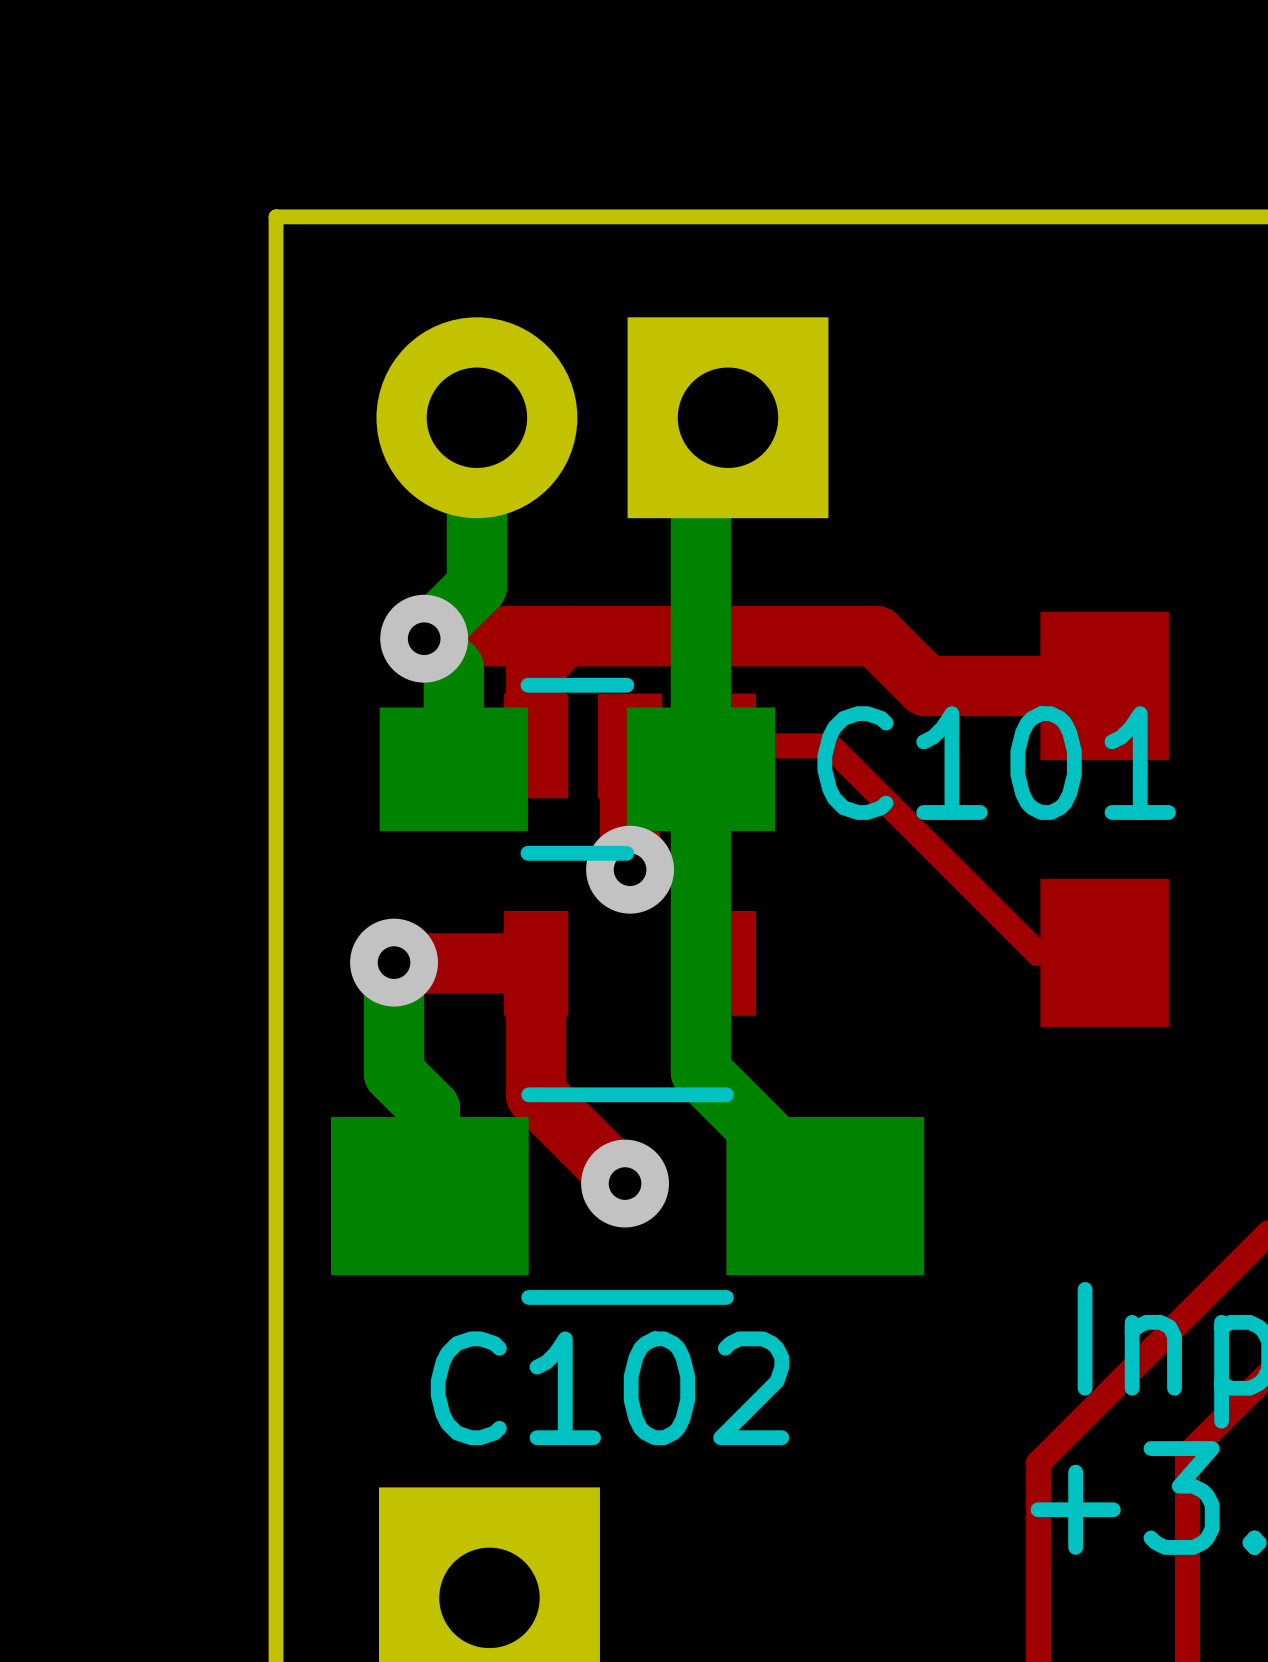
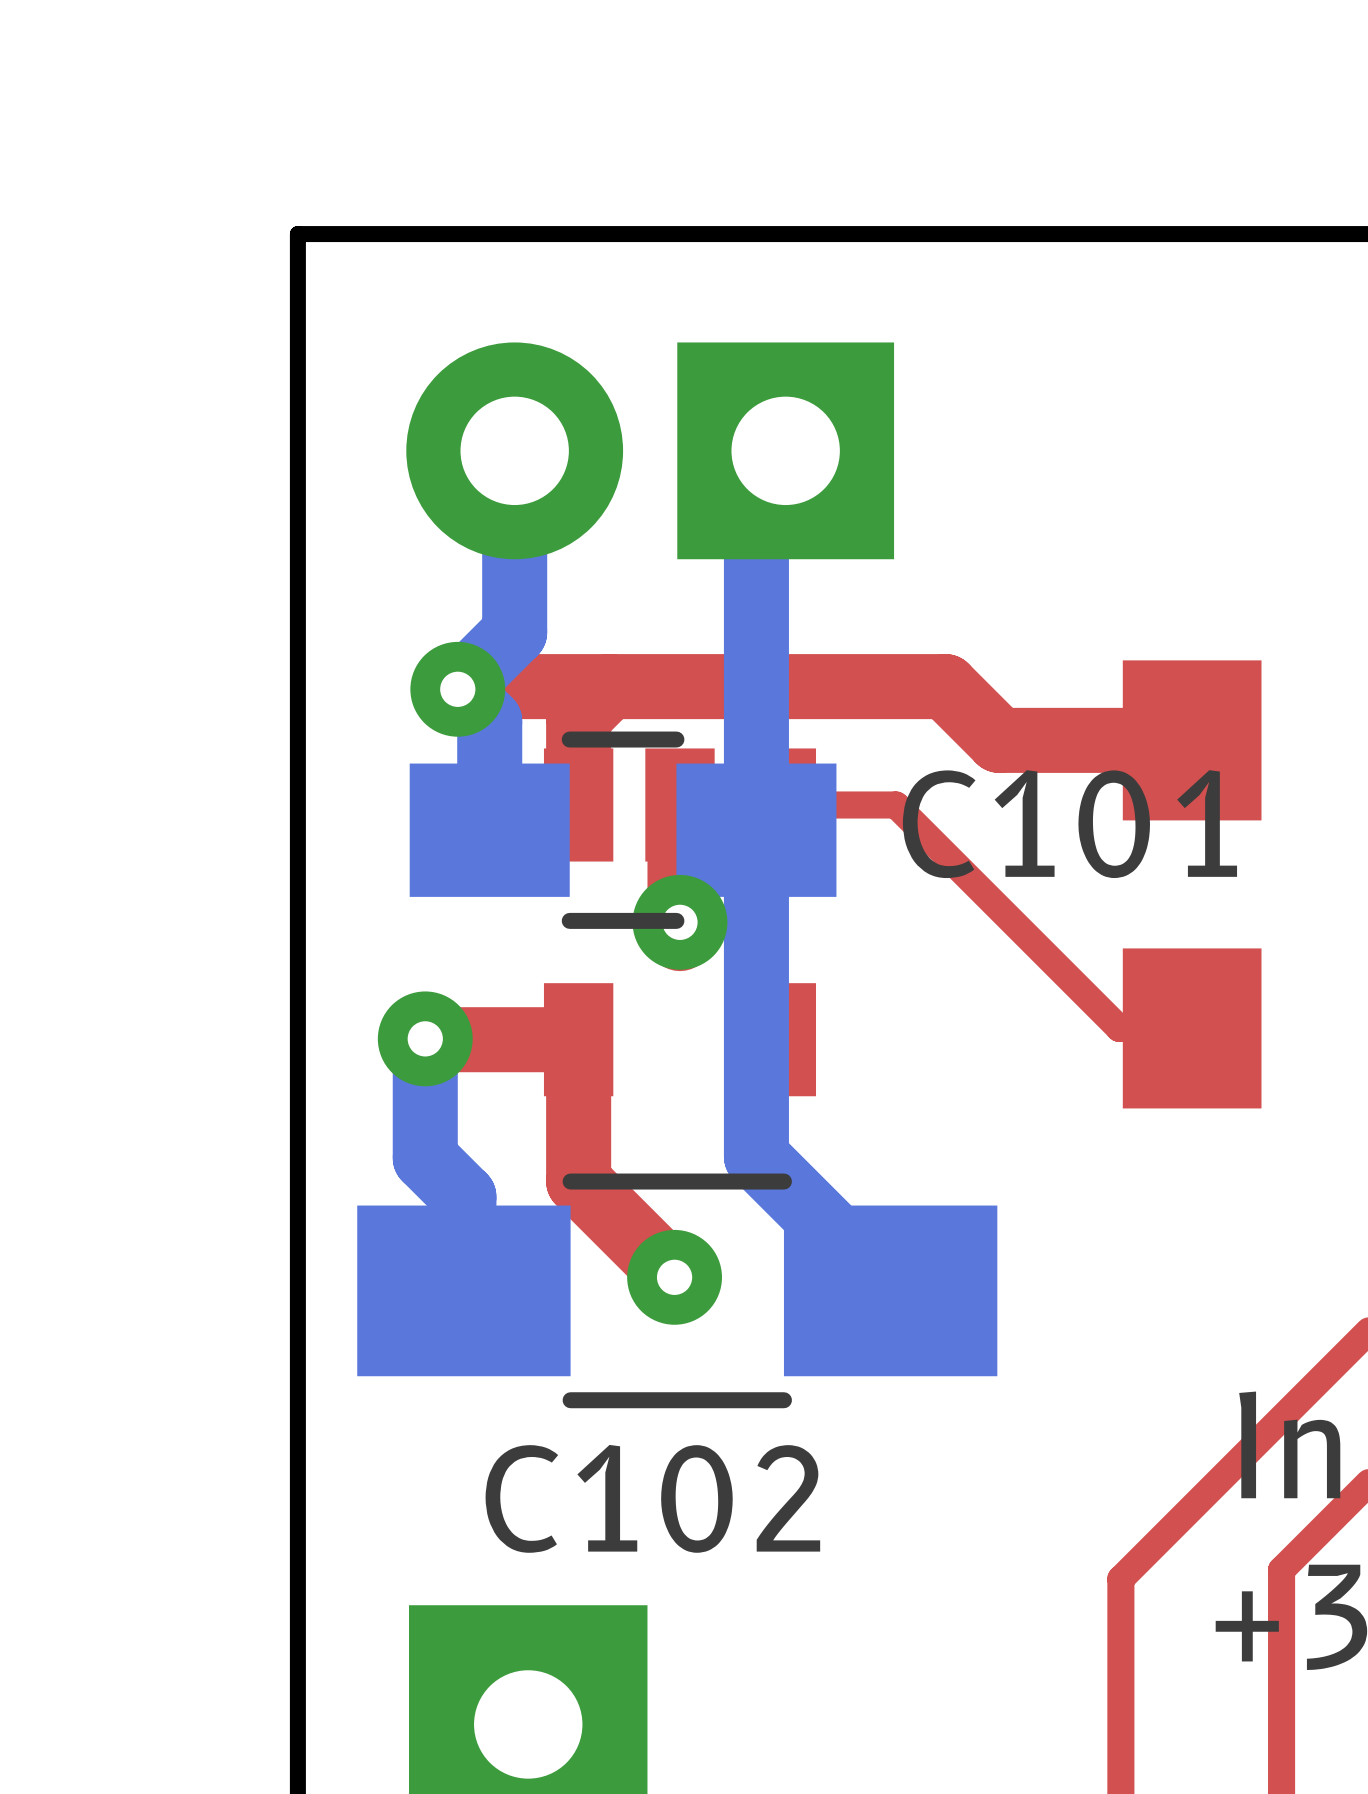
via position: (630, 869) -> (679, 922)

